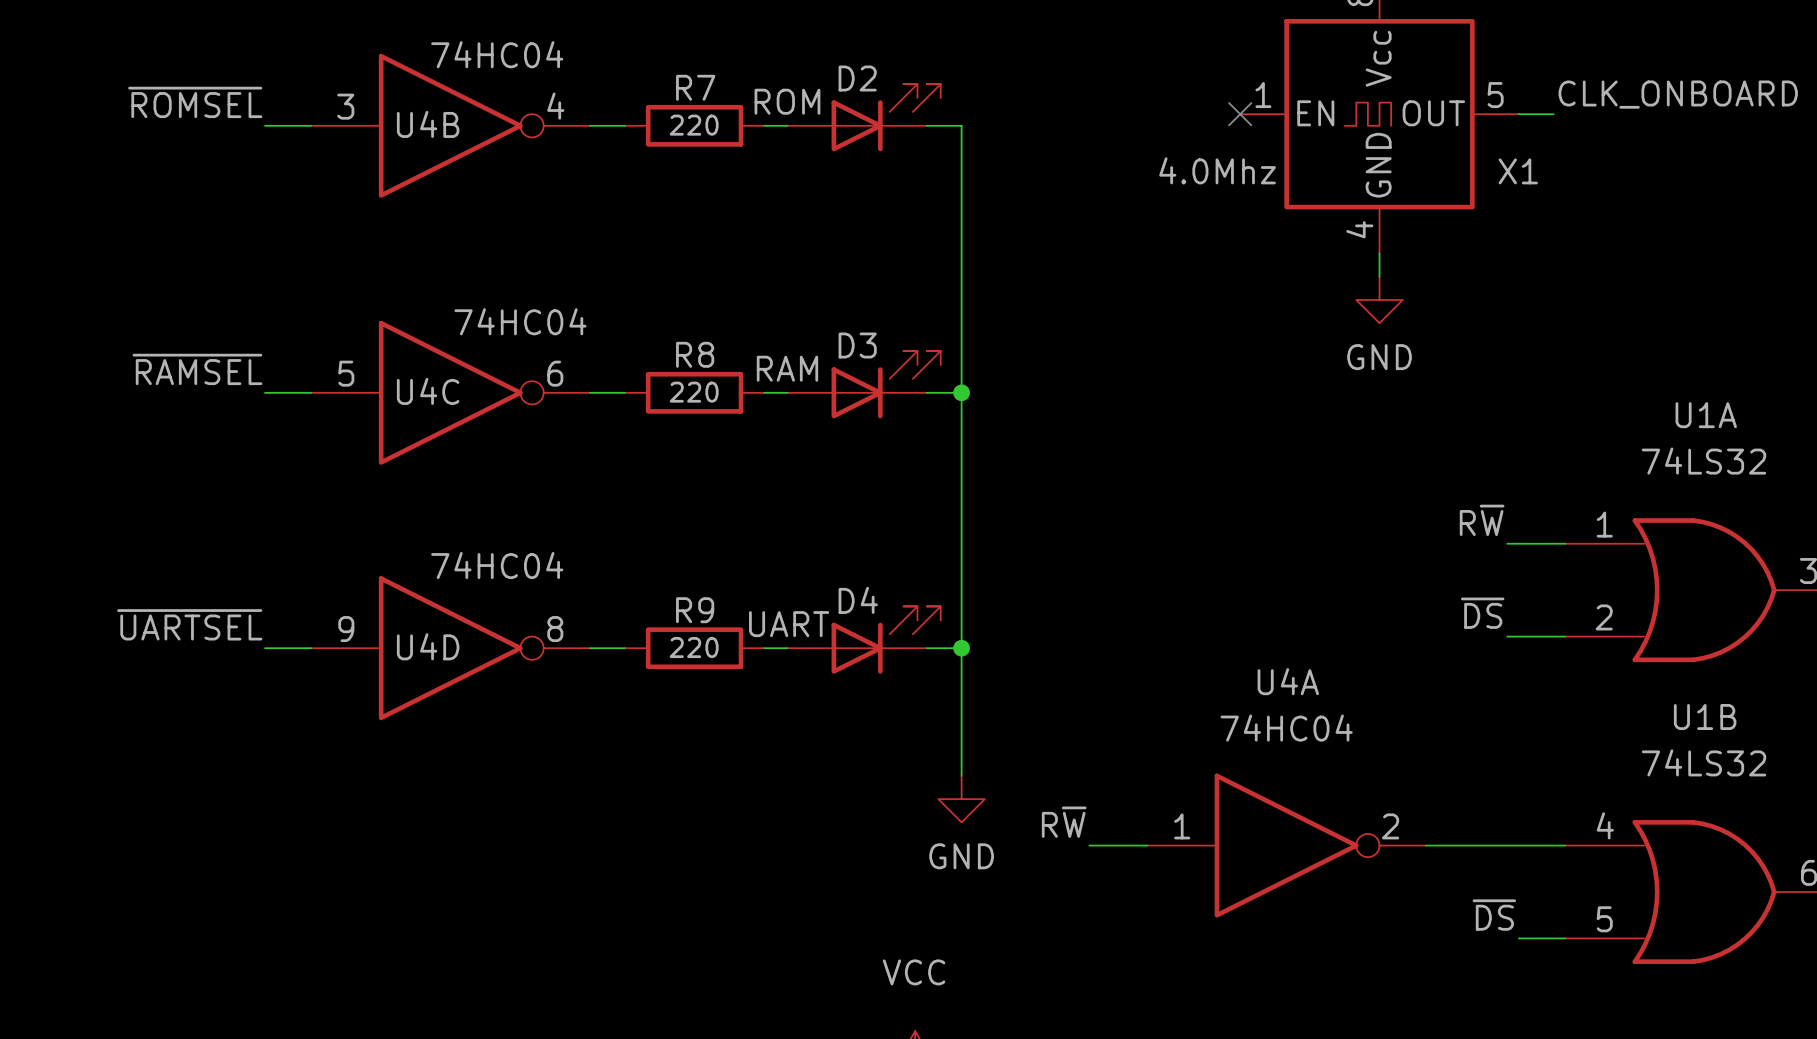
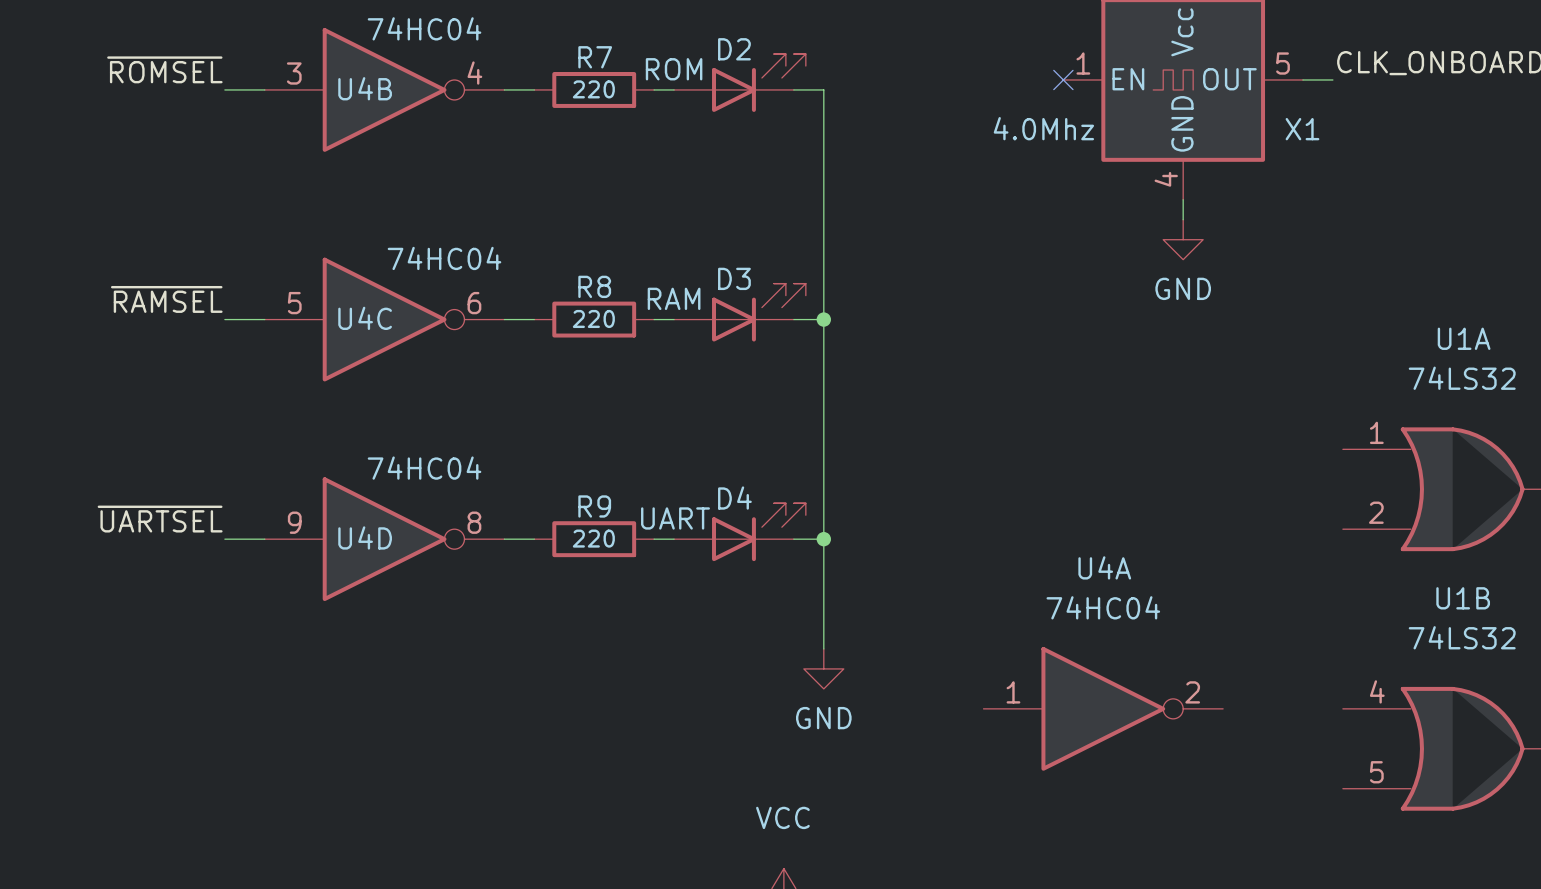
label: R~{W} (1482, 520) -> none
wire: (1507, 543) (1565, 543) -> none
label: ~{DS} (1482, 613) -> none
wire: (1507, 636) (1565, 636) -> none
label: R~{W} (1064, 822) -> none
wire: (1089, 845) (1147, 845) -> none
wire: (1425, 845) (1565, 845) -> none
label: ~{DS} (1494, 915) -> none
wire: (1518, 938) (1565, 938) -> none

